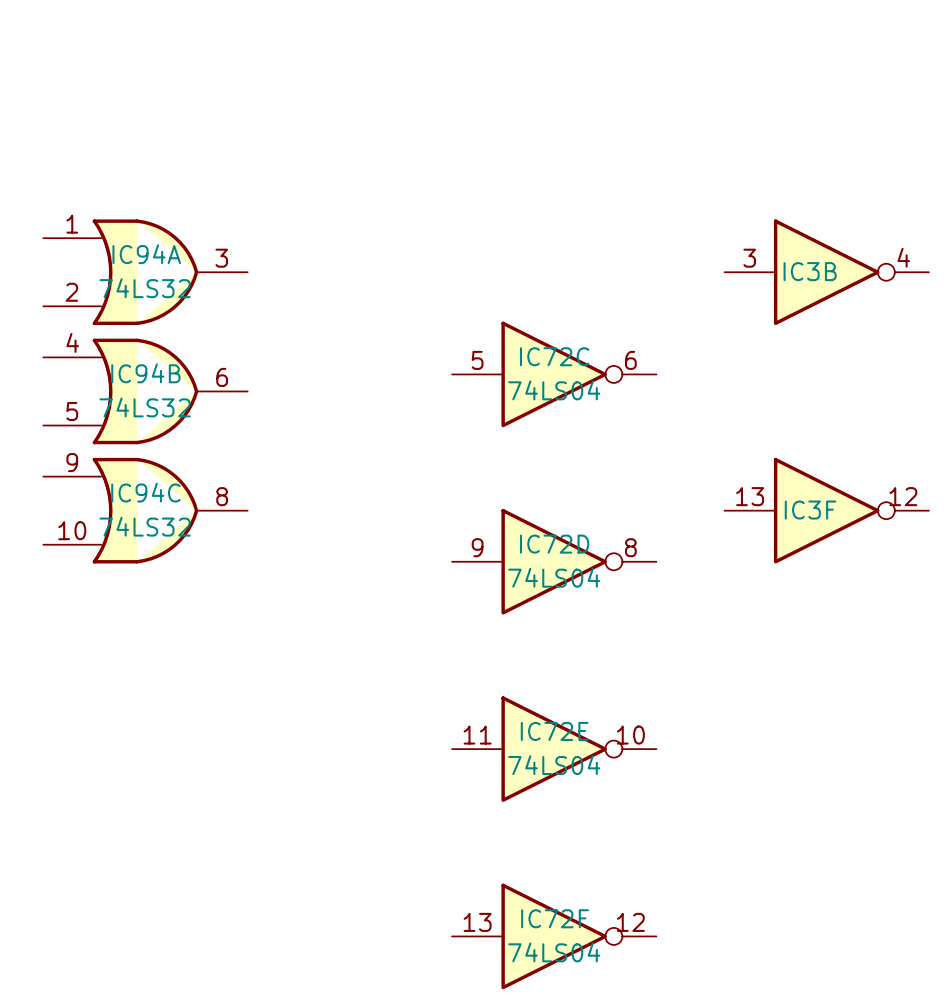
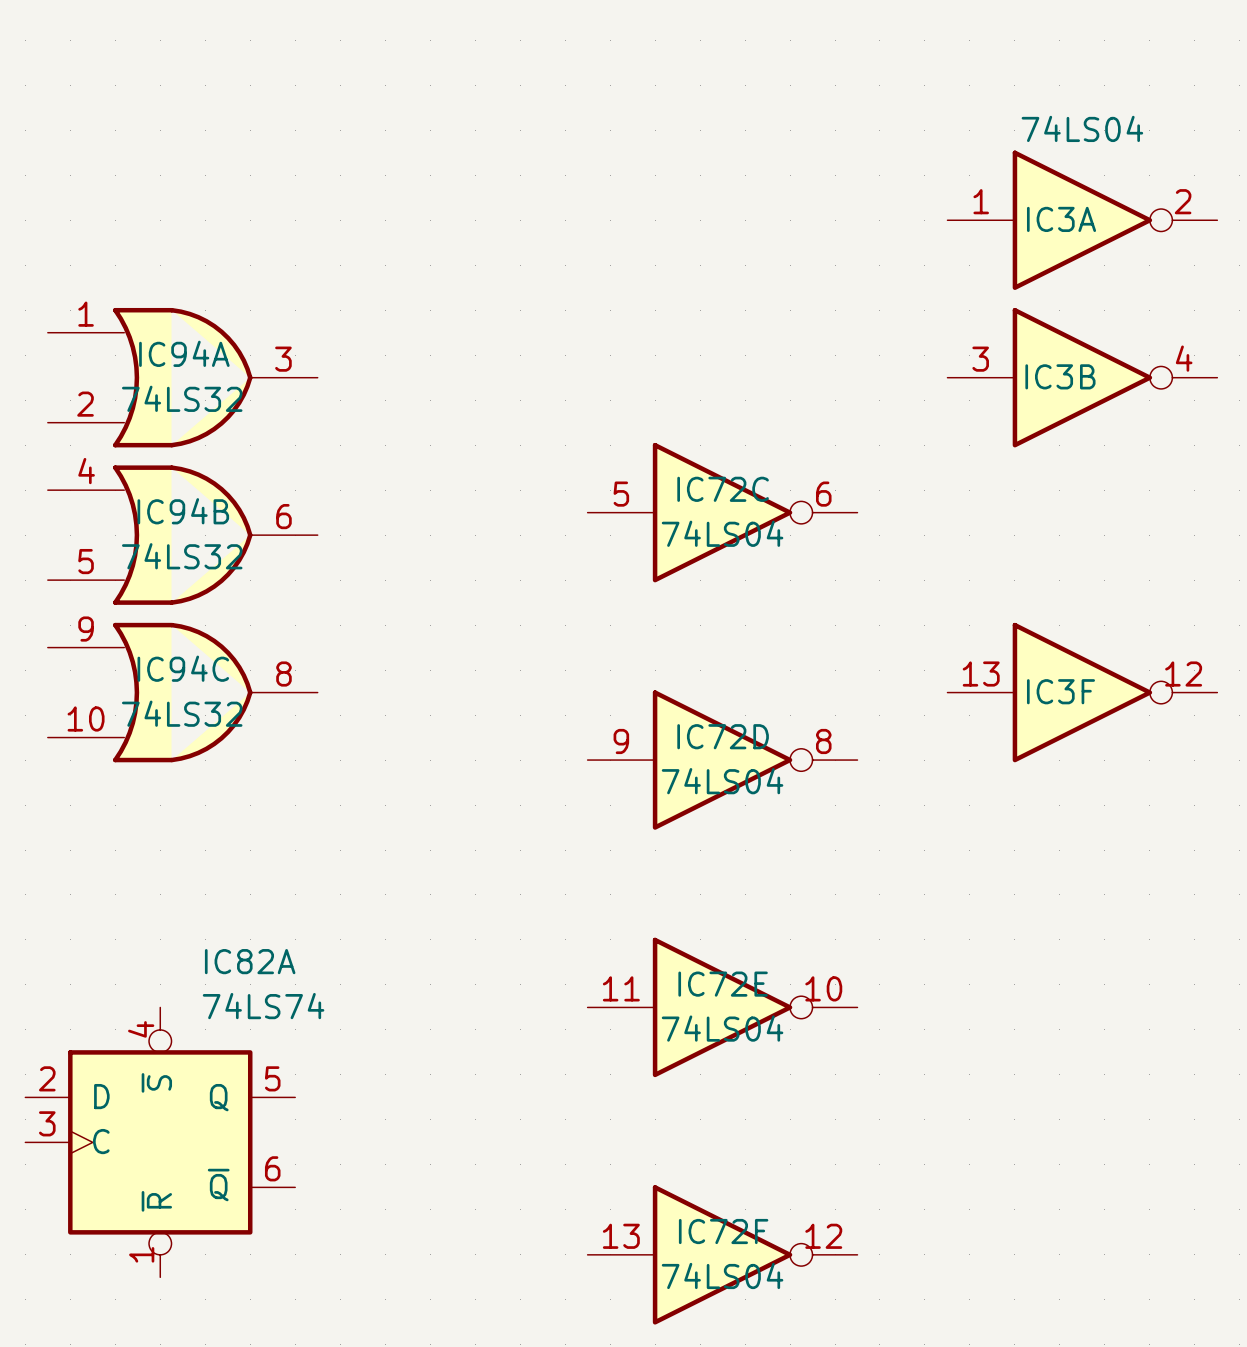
IC3A: none -> 74LS04 (1082, 220)
IC82A: none -> 74LS74 (160, 1142)

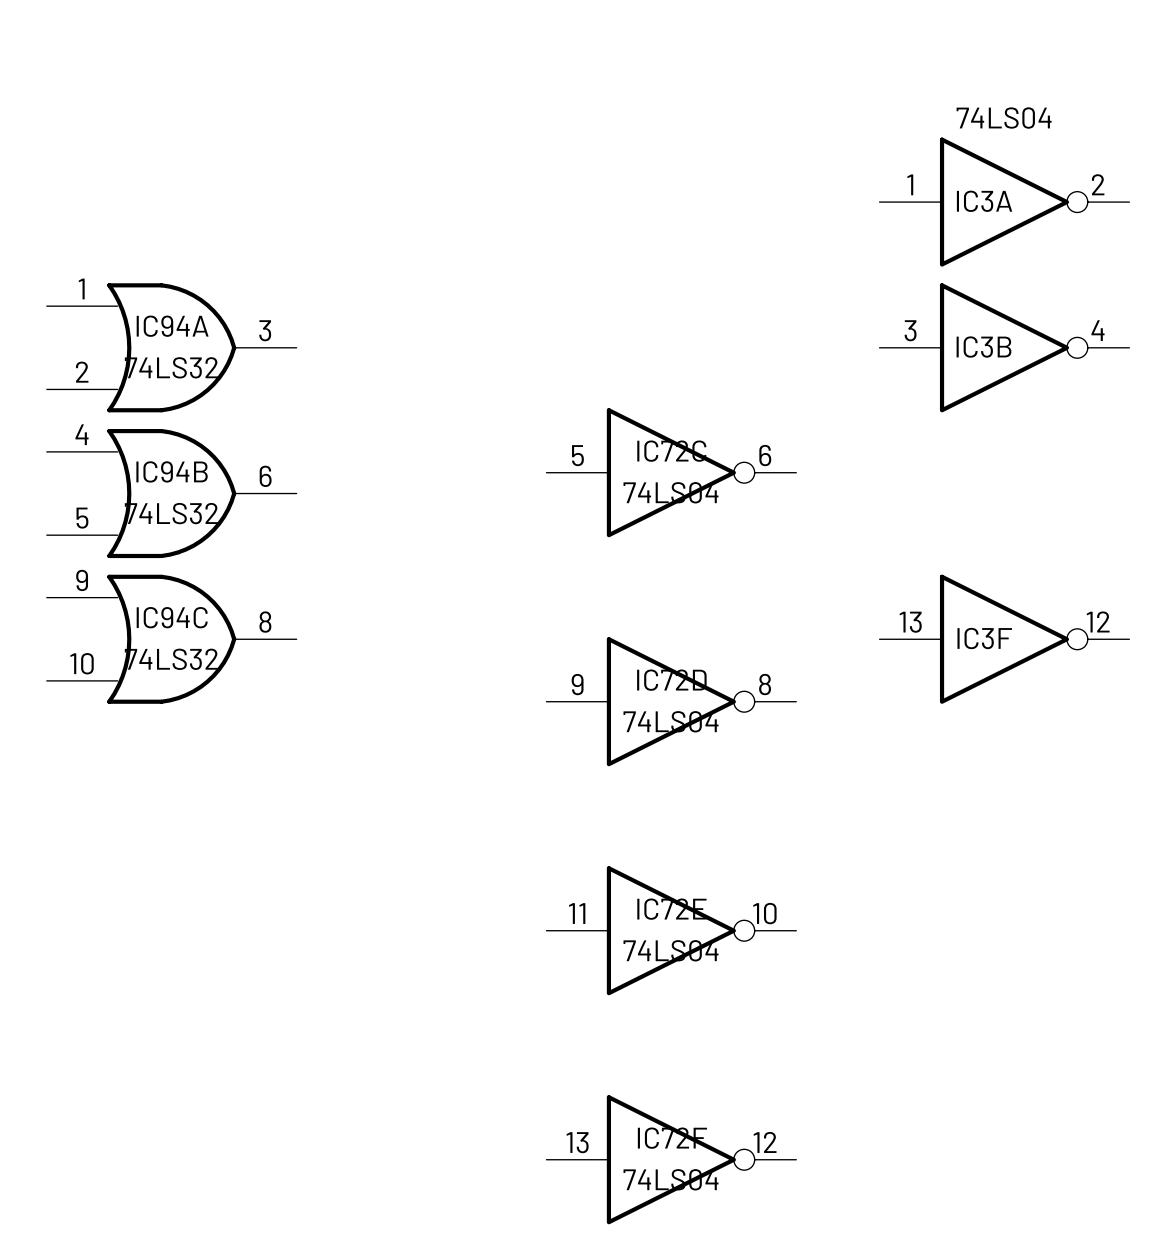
IC82A: 74LS74 (160, 1142) -> none

